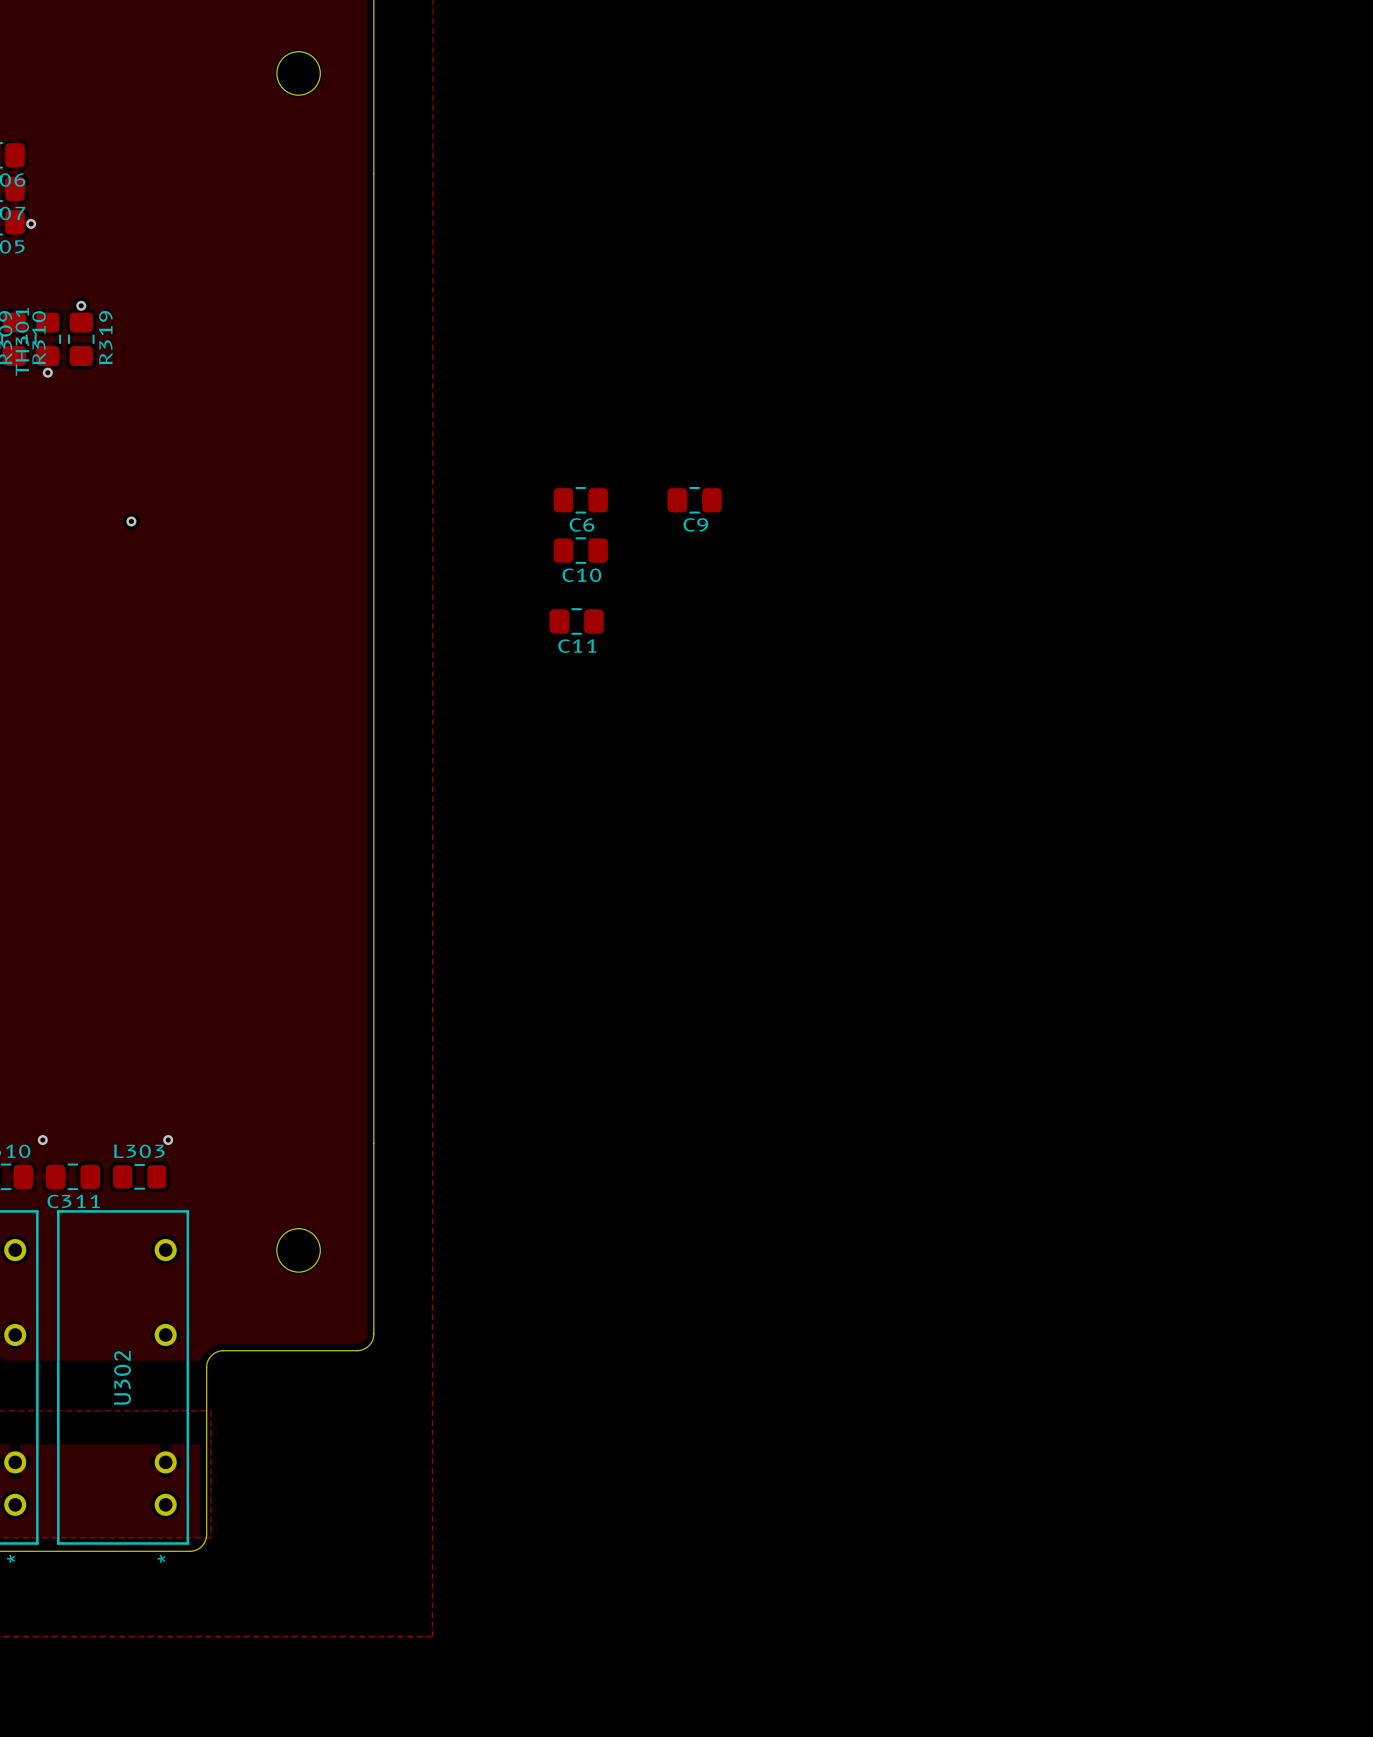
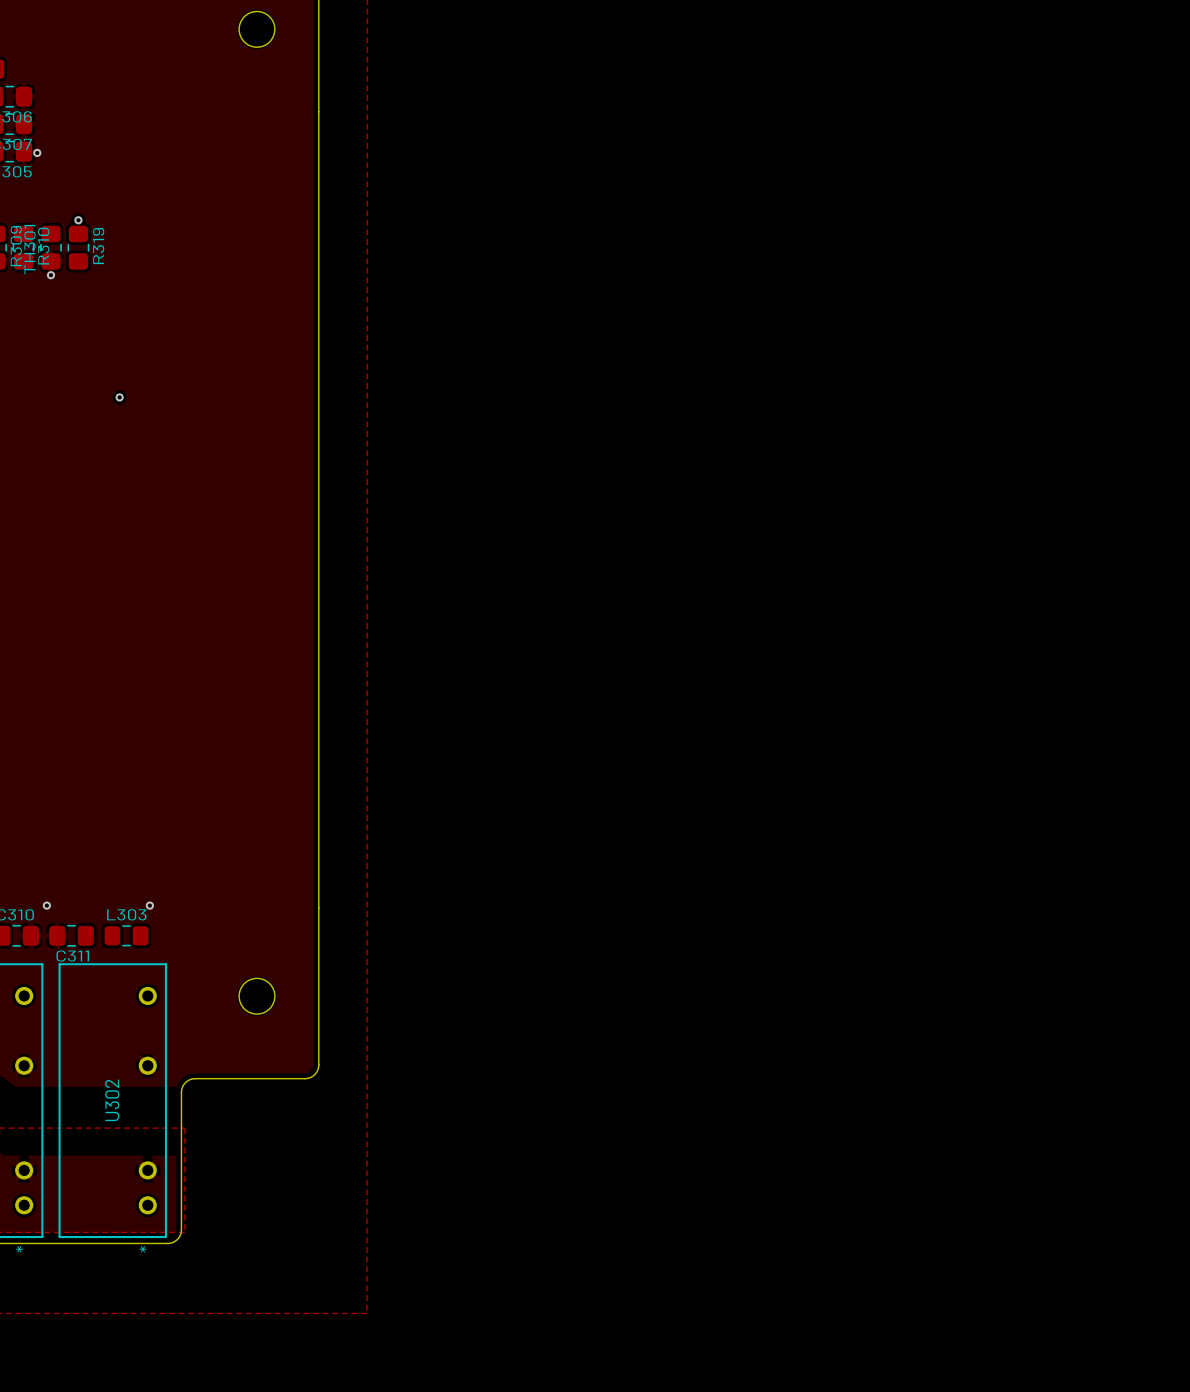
C6: (580, 500) -> none
C9: (694, 500) -> none
C10: (580, 550) -> none
C11: (576, 621) -> none

